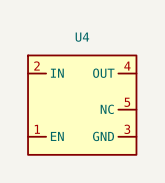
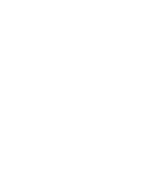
U4: (82, 105) -> none

